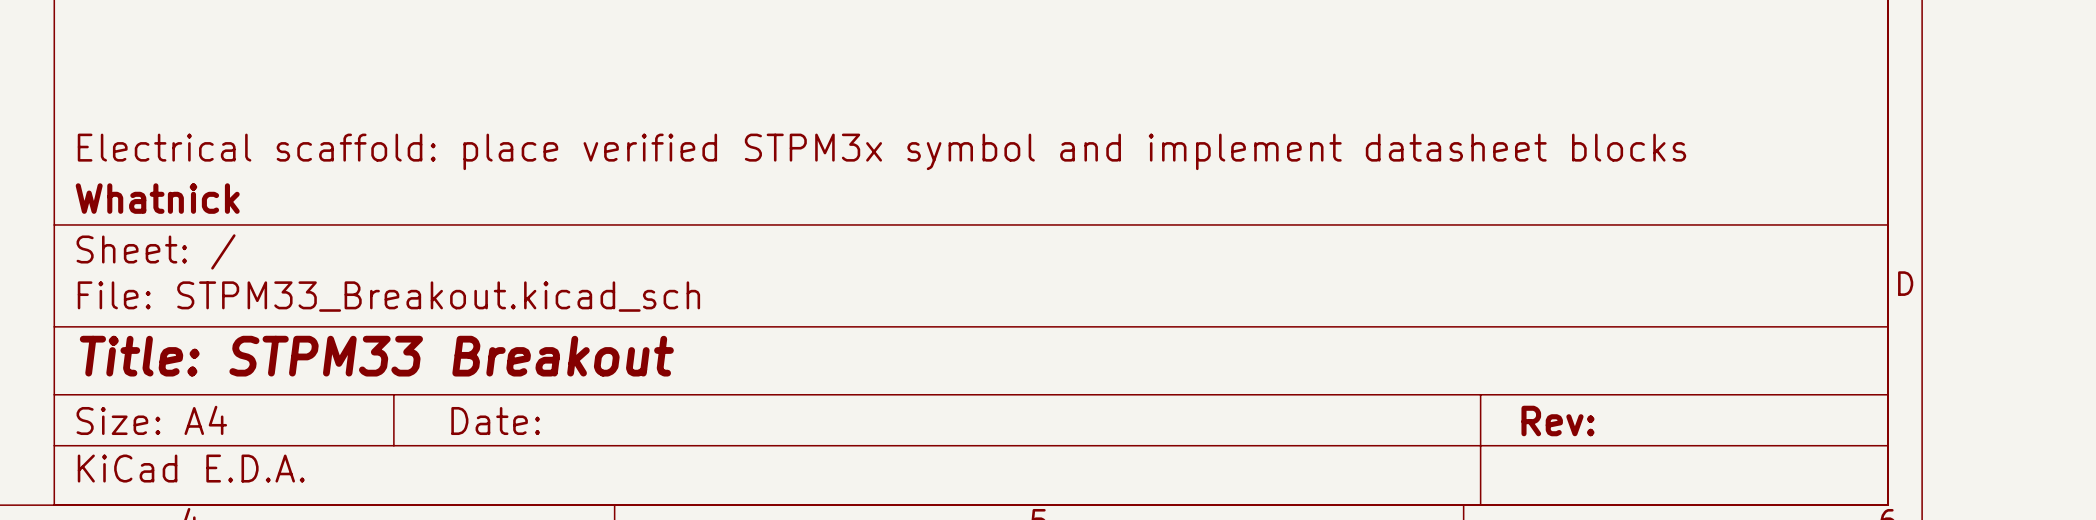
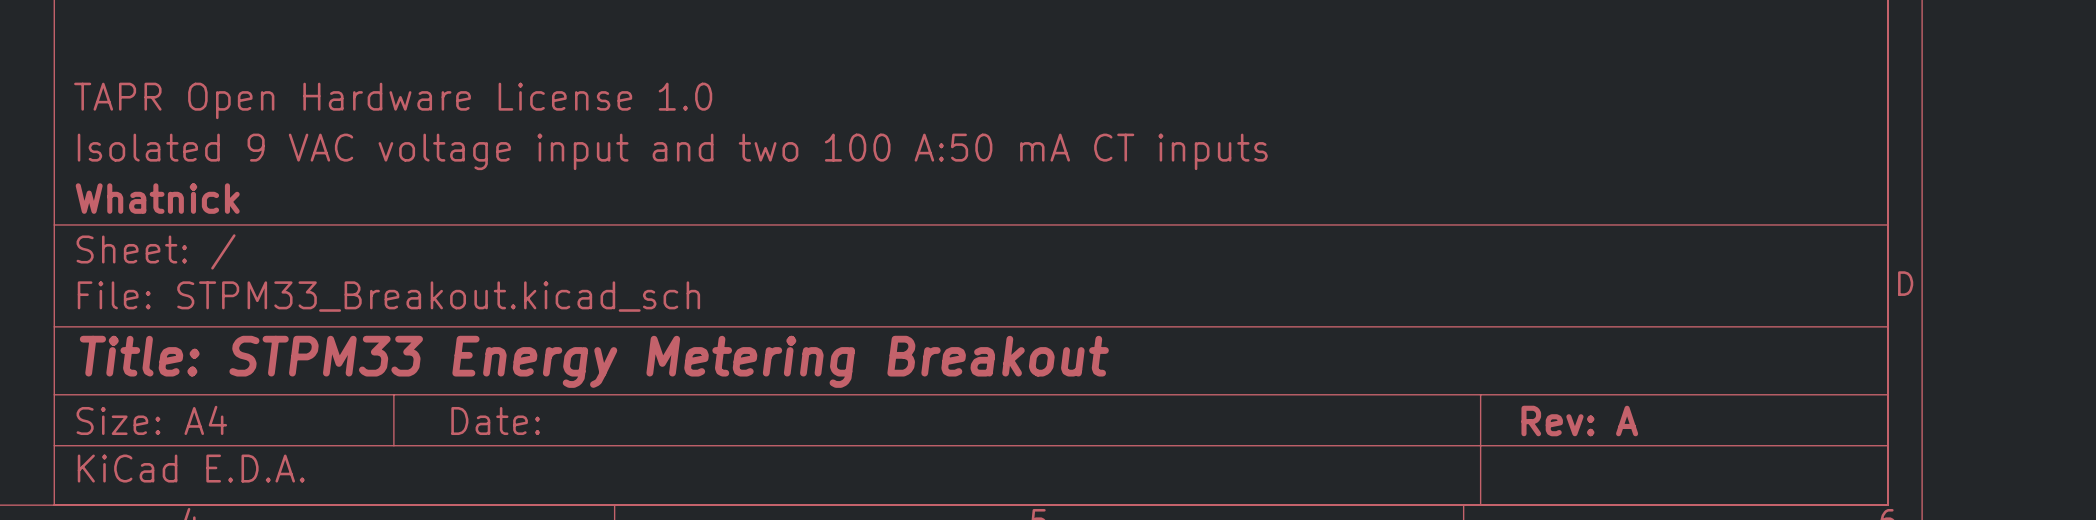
title block: none -> TAPR Open Hardware License 1.0 (393, 100)
title block: Electrical scaffold: place verified STPM3x symbol and implement datasheet blocks (881, 151) -> Isolated 9 VAC voltage input and two 100 A:50 mA CT inputs (672, 151)
title block: Title: STPM33 Breakout (376, 356) -> Title: STPM33 Energy Metering Breakout (594, 361)
title block: Rev: (1557, 421) -> Rev: A (1579, 421)

